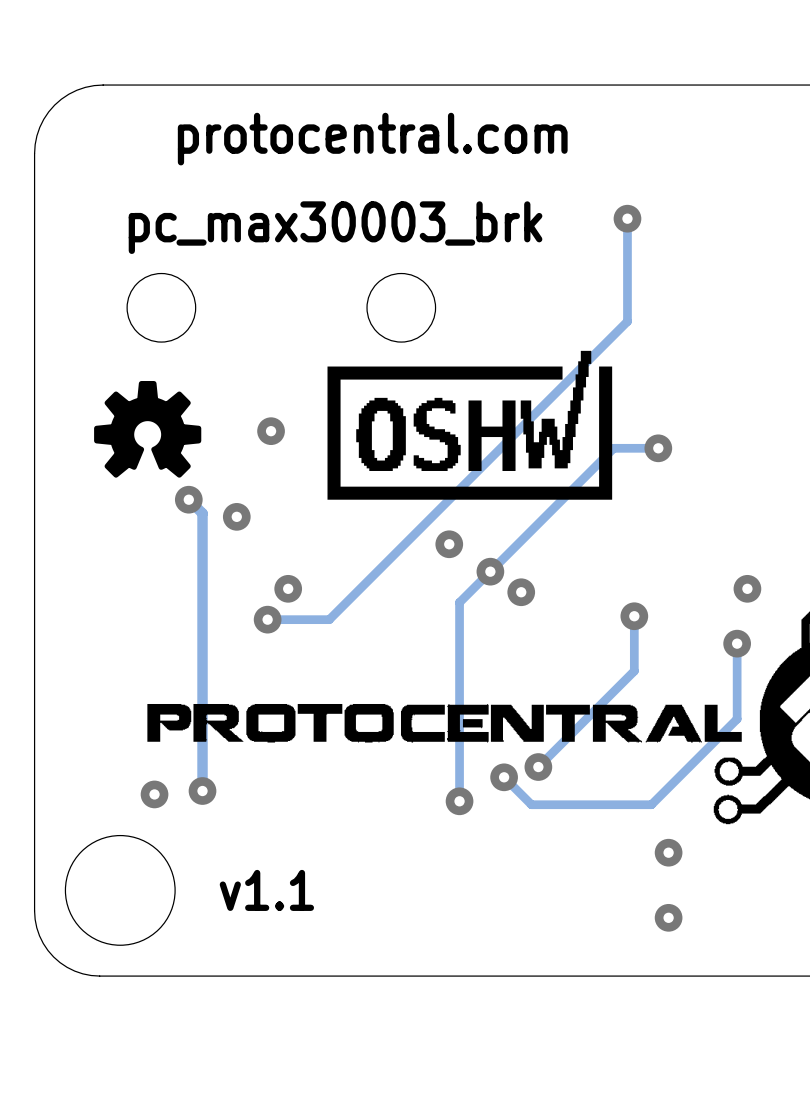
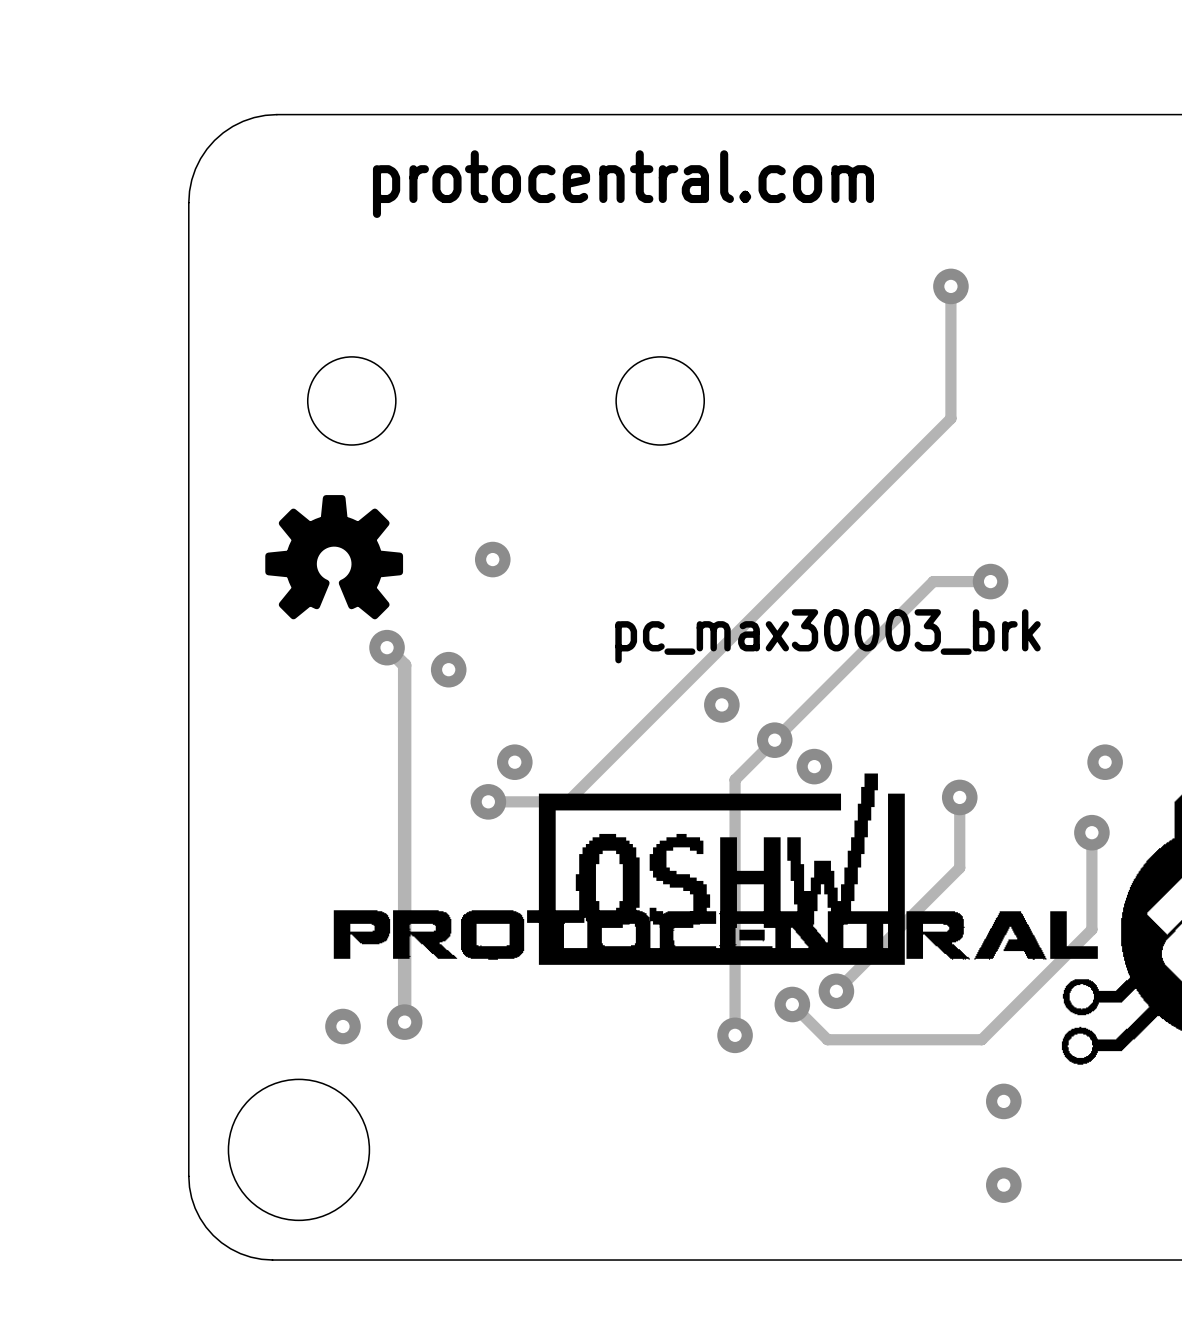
text: pc_max30003_brk (335, 227) -> none
drawing position: (469, 425) -> (721, 869)
text: none -> pc_max30003_brk (828, 636)
text: v1.1 (266, 890) -> none

